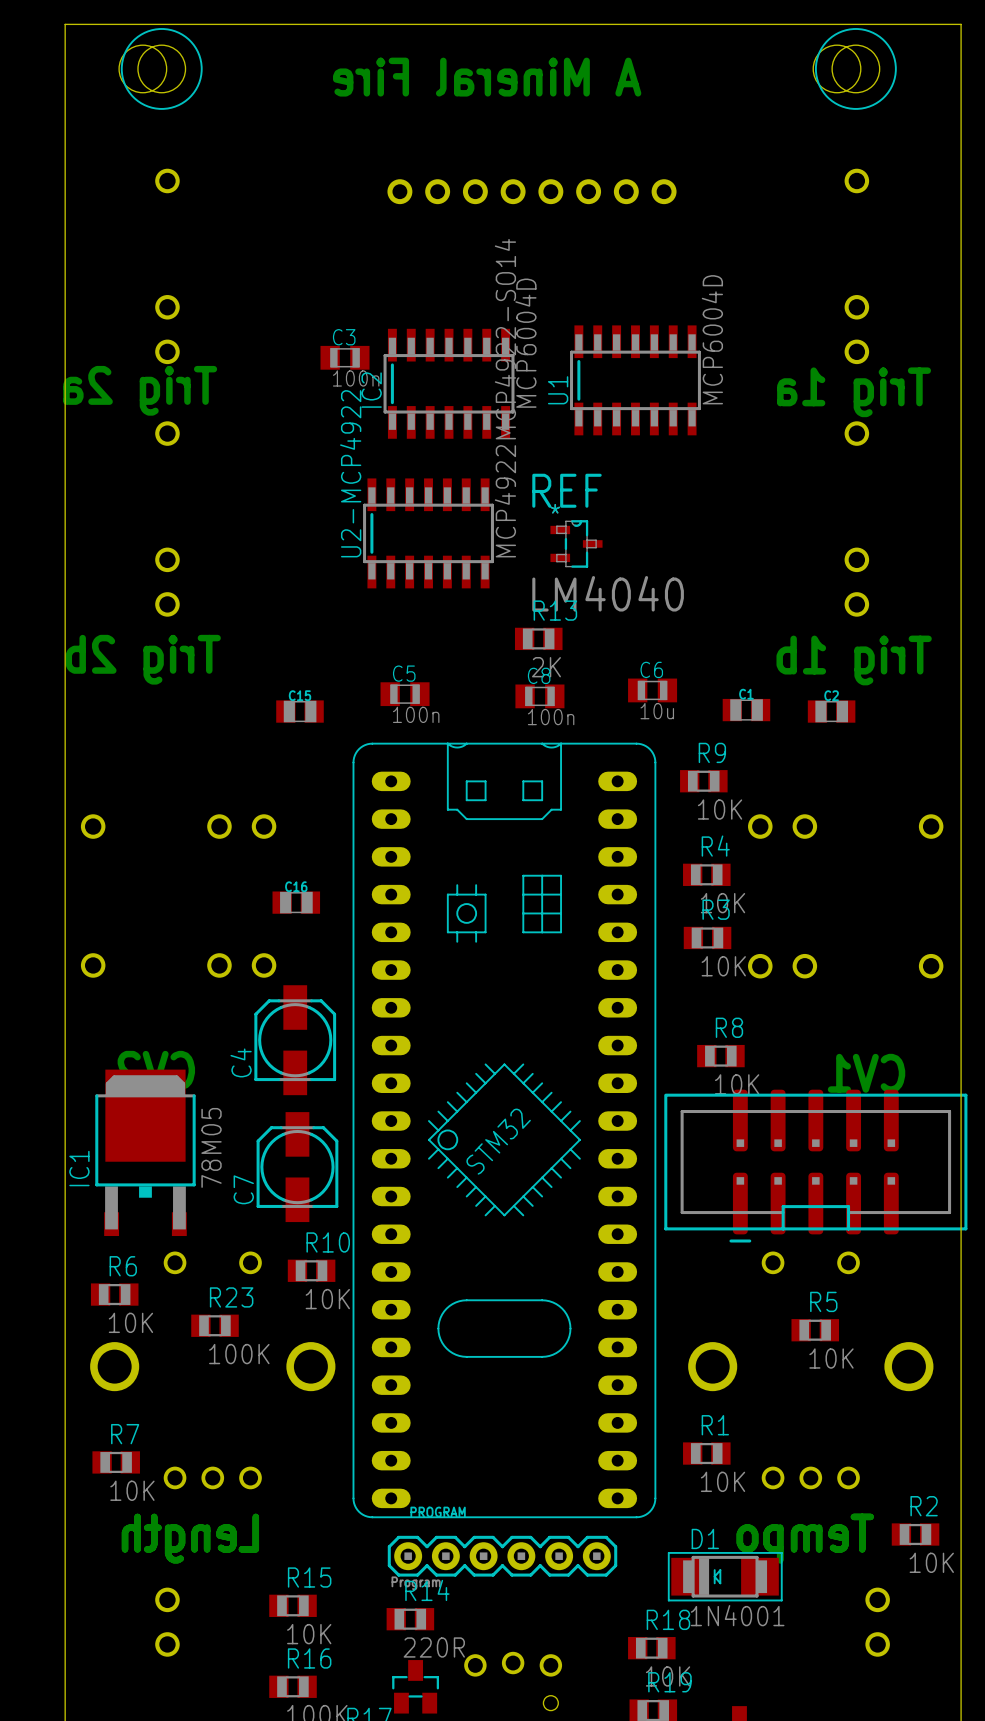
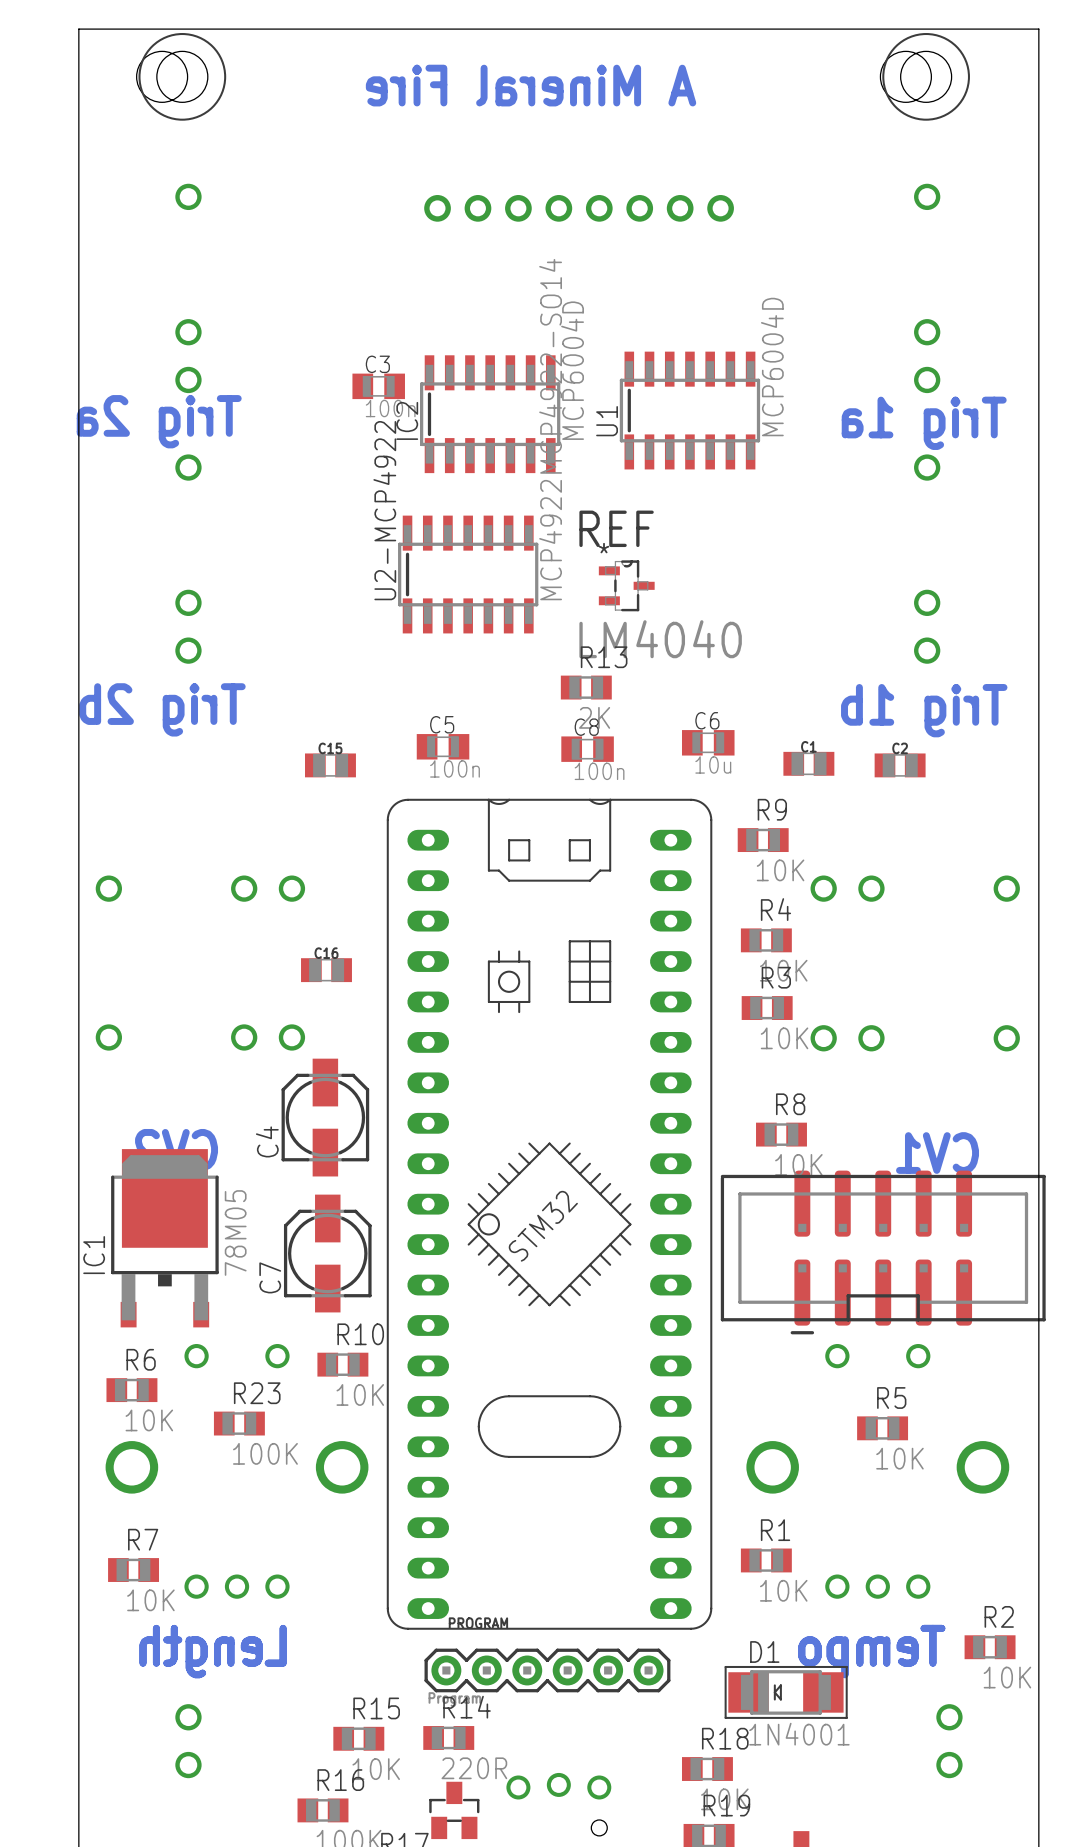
R15 position: (293, 1605) -> (358, 1738)

